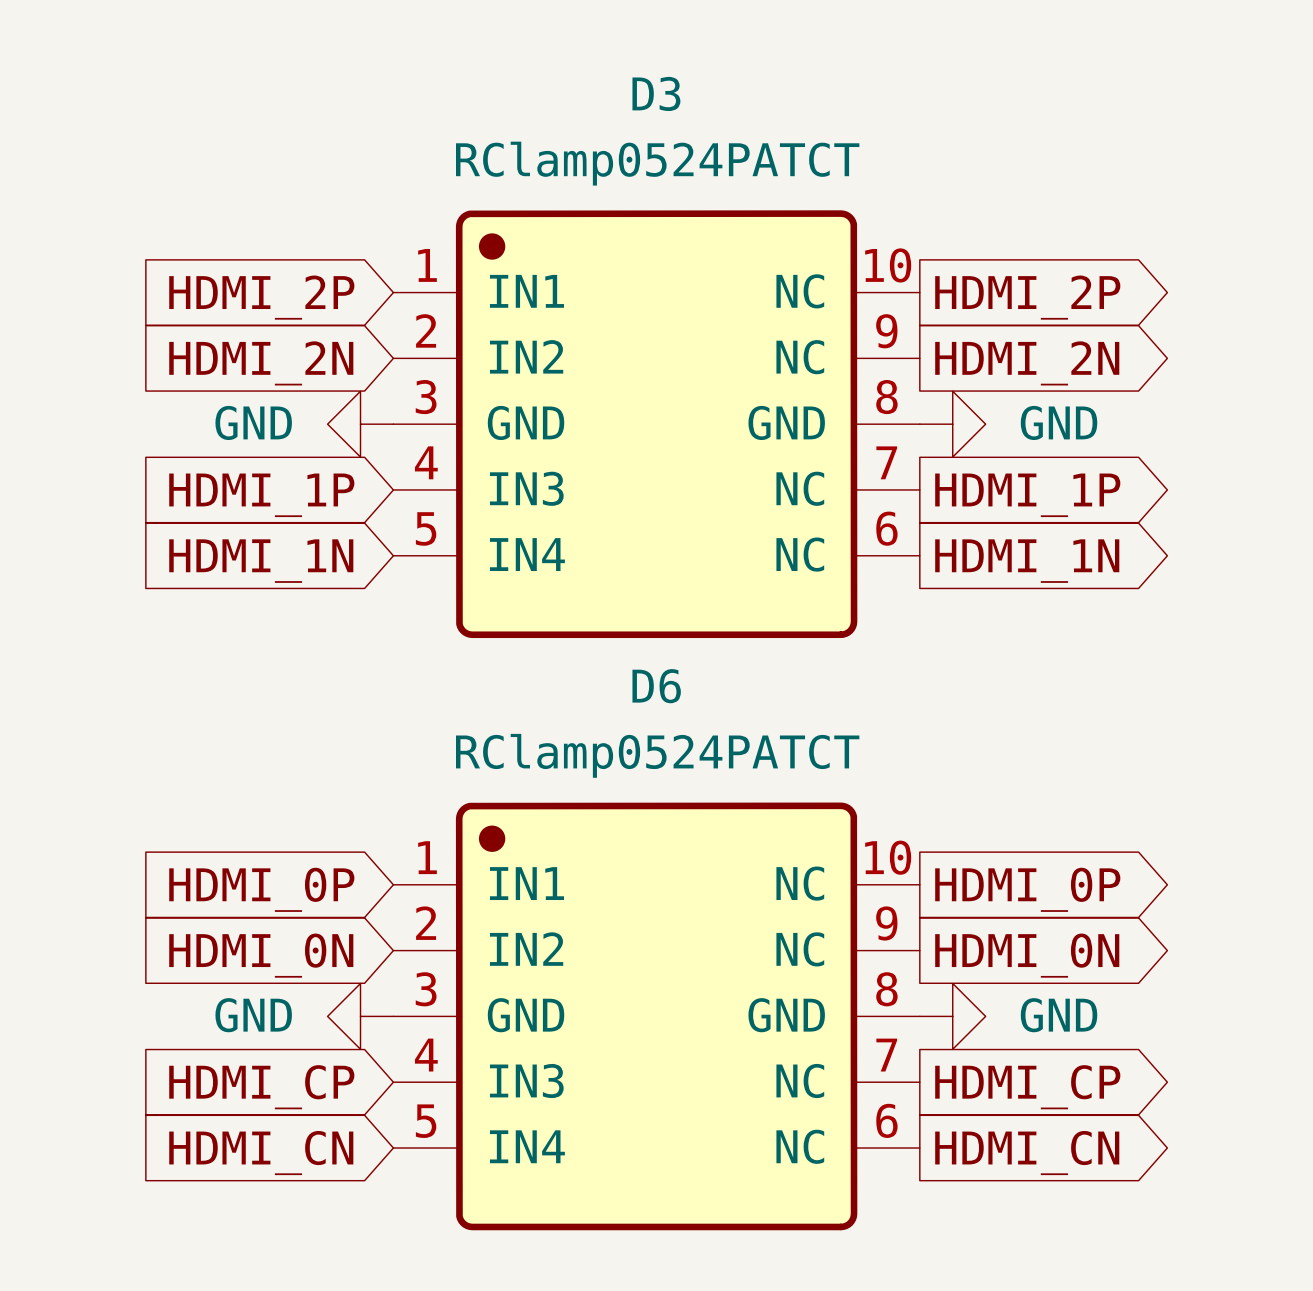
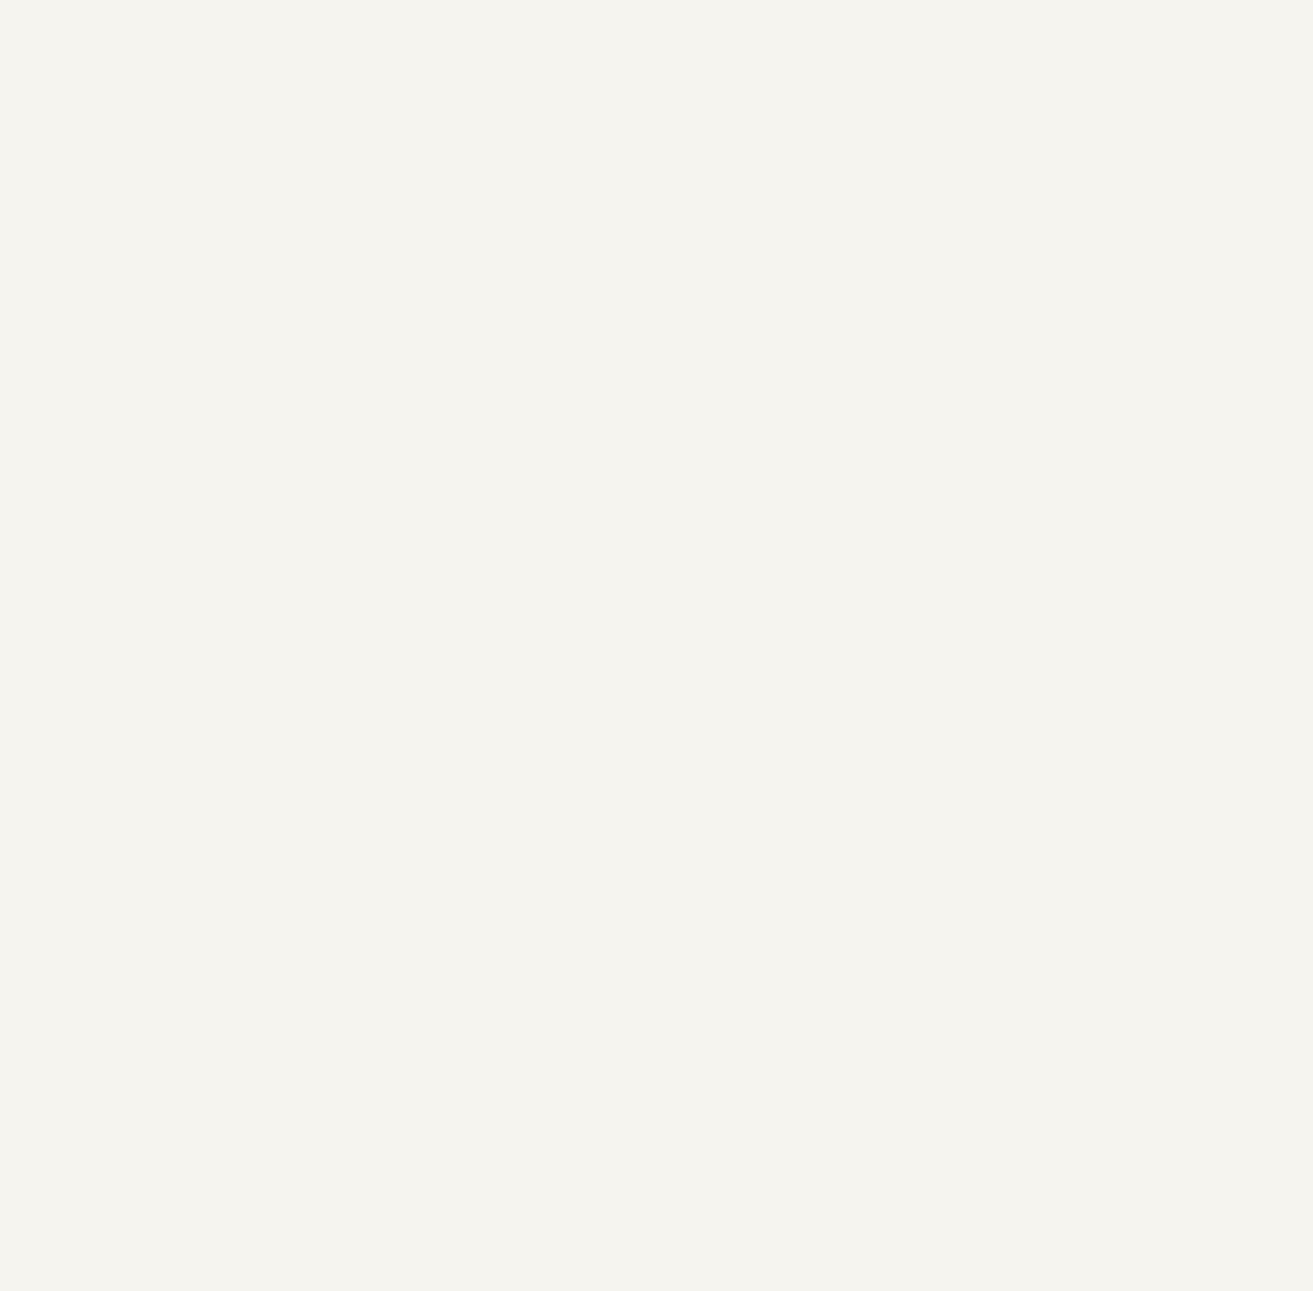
global label: HDMI_2P (261, 297) -> none
global label: HDMI_2P (1027, 297) -> none
global label: HDMI_2N (261, 363) -> none
global label: HDMI_2N (1027, 363) -> none
power symbol: GND (360, 424) -> none
D3: RClamp0524PATCT (656, 424) -> none
power symbol: GND (952, 424) -> none
global label: HDMI_1P (261, 495) -> none
global label: HDMI_1P (1027, 495) -> none
global label: HDMI_1N (261, 561) -> none
global label: HDMI_1N (1027, 561) -> none
global label: HDMI_0P (261, 889) -> none
global label: HDMI_0P (1027, 889) -> none
global label: HDMI_0N (261, 955) -> none
global label: HDMI_0N (1027, 955) -> none
power symbol: GND (360, 1016) -> none
D6: RClamp0524PATCT (656, 1016) -> none
power symbol: GND (952, 1016) -> none
global label: HDMI_CP (261, 1087) -> none
global label: HDMI_CP (1027, 1087) -> none
global label: HDMI_CN (261, 1153) -> none
global label: HDMI_CN (1027, 1153) -> none

